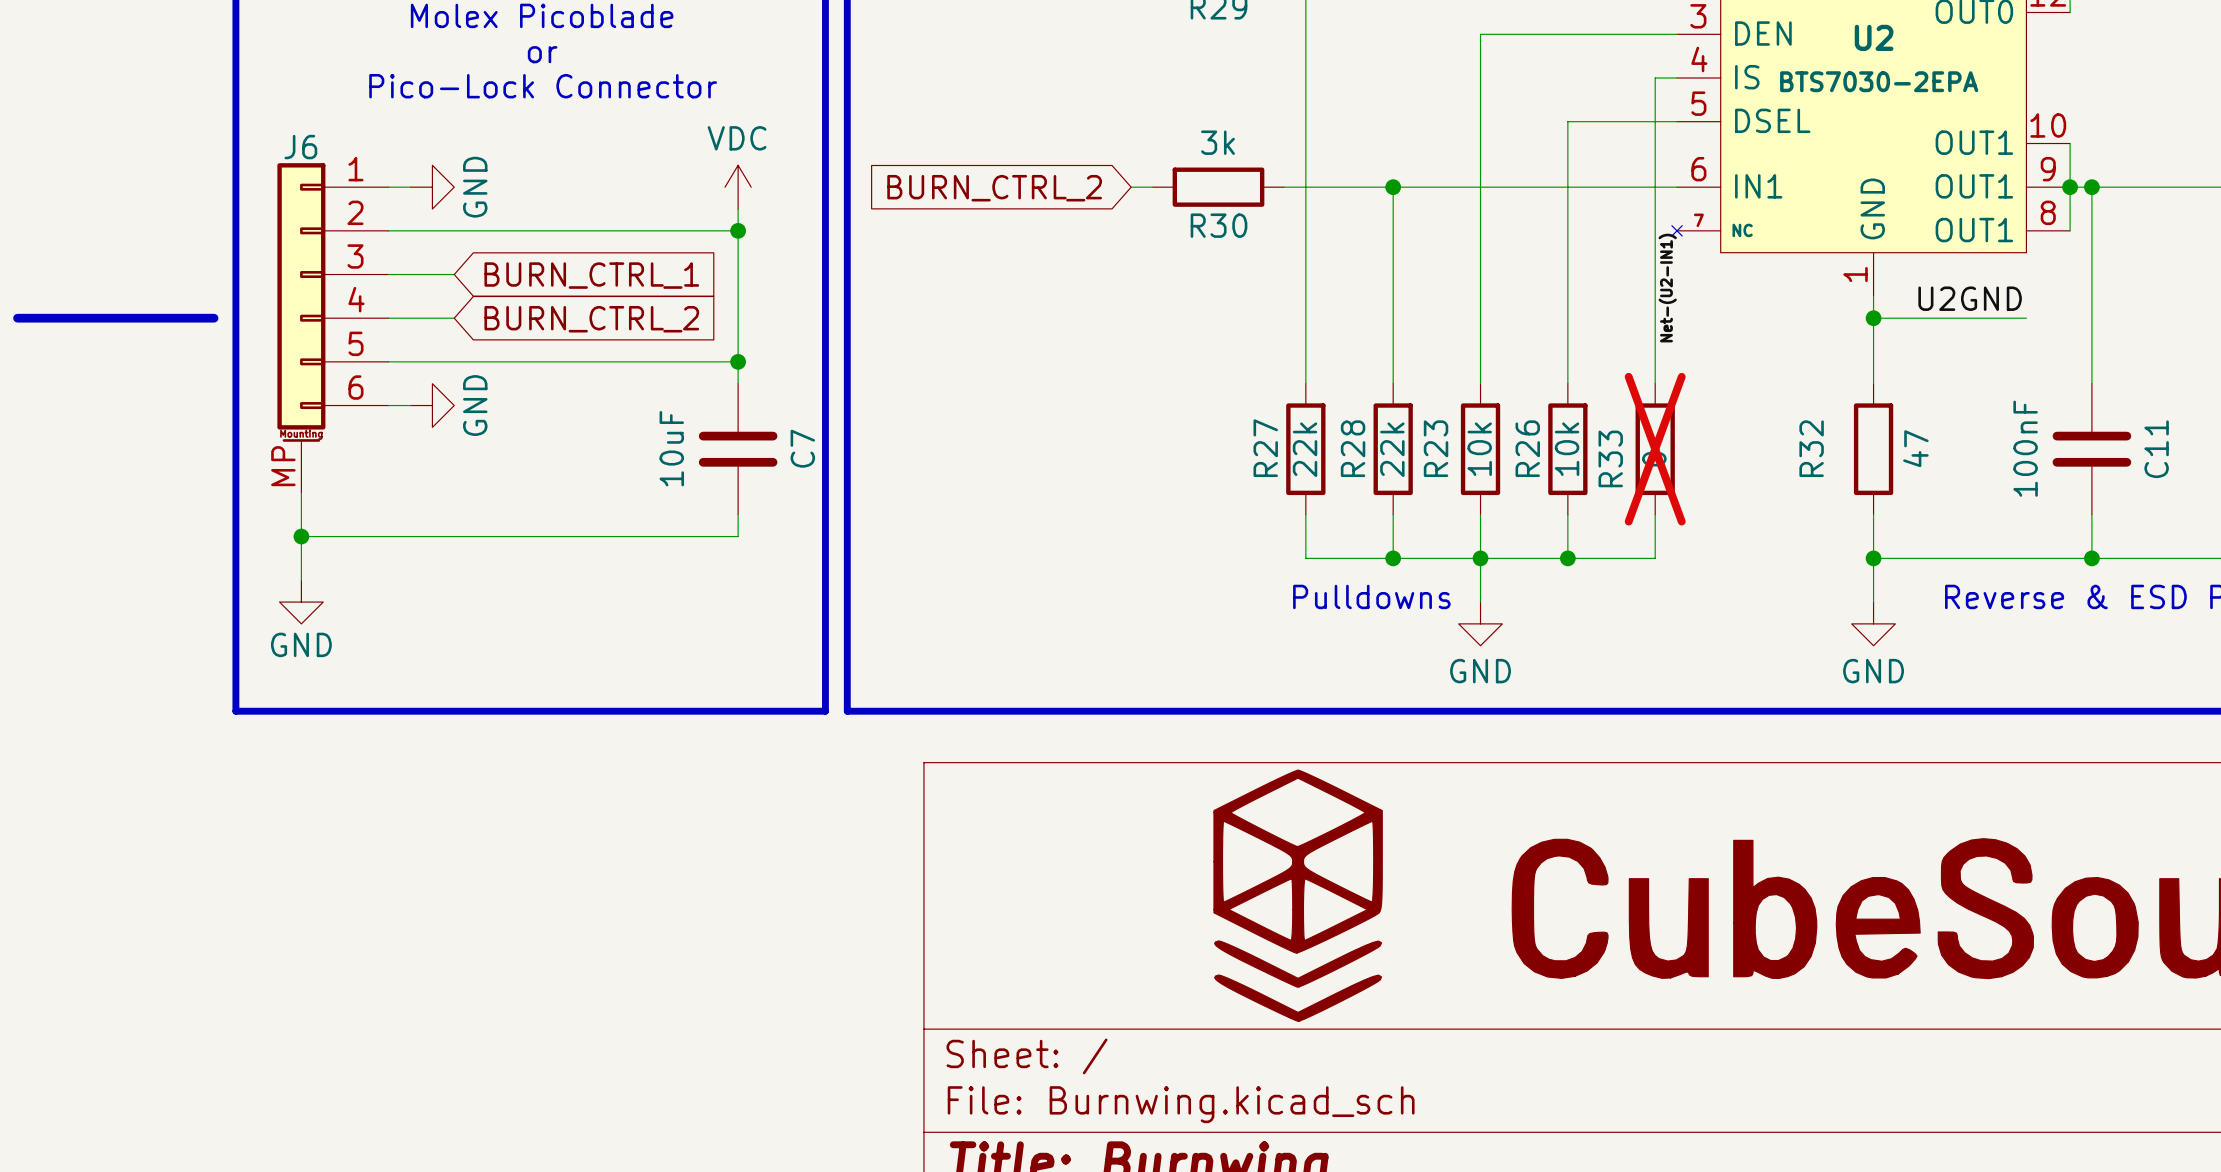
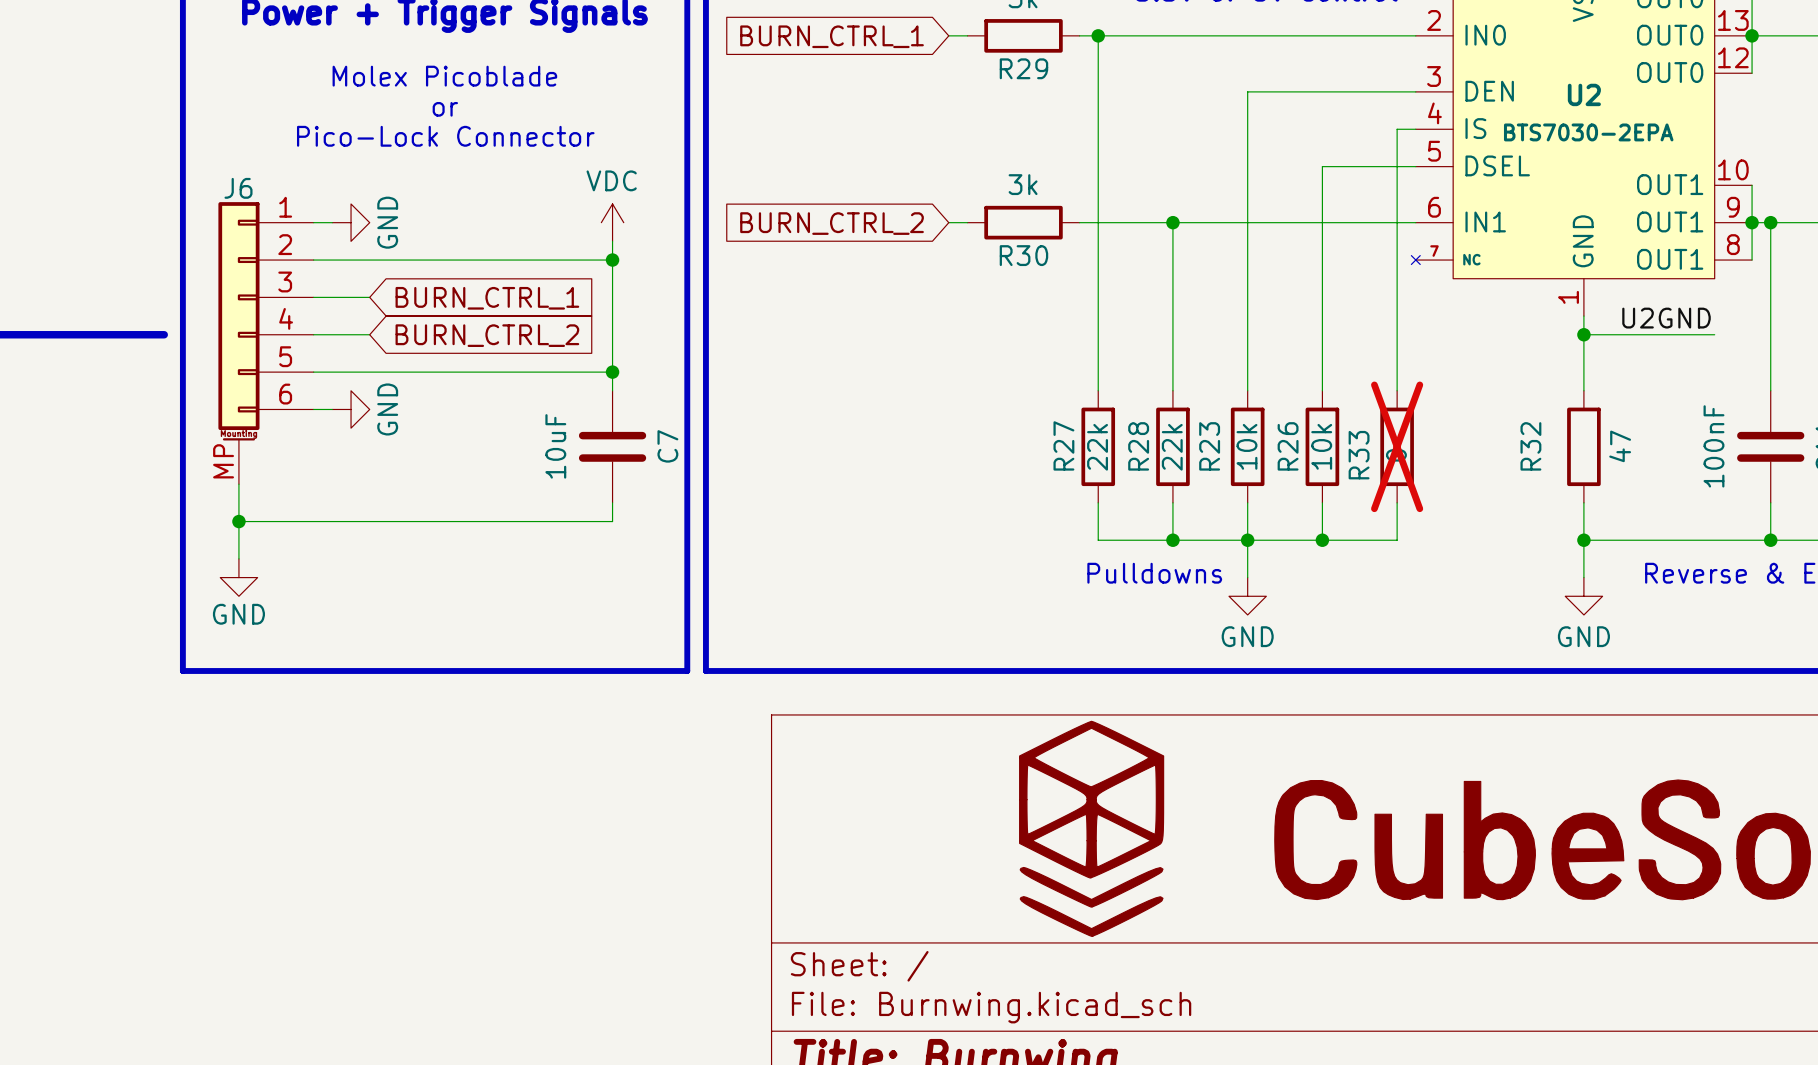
label: Net-(U2-IN1) (1667, 288) -> none

